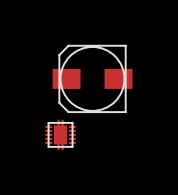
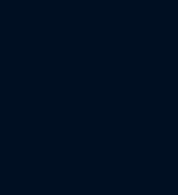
part: (92, 78) -> none
part: (60, 134) -> none

